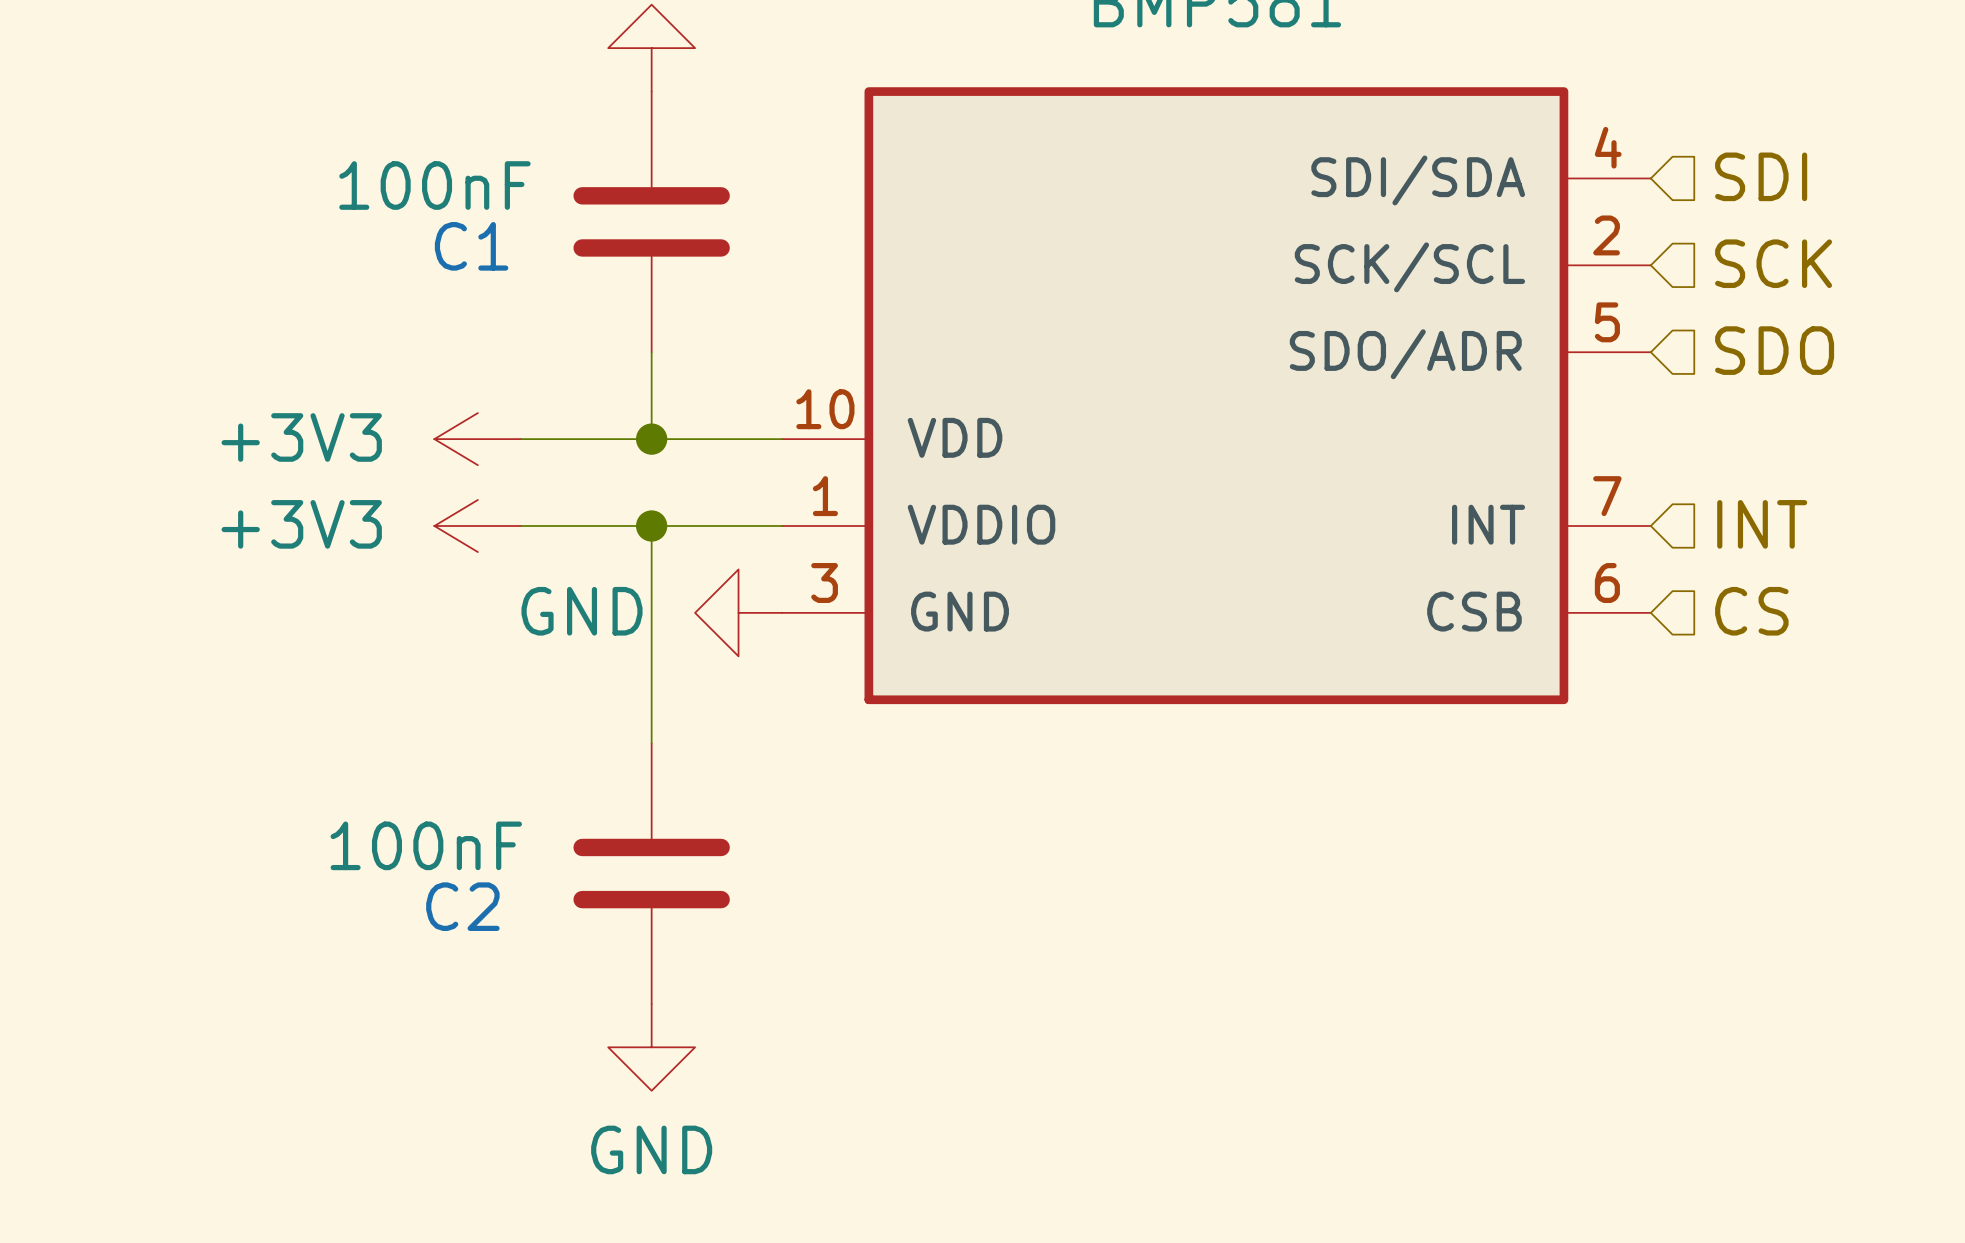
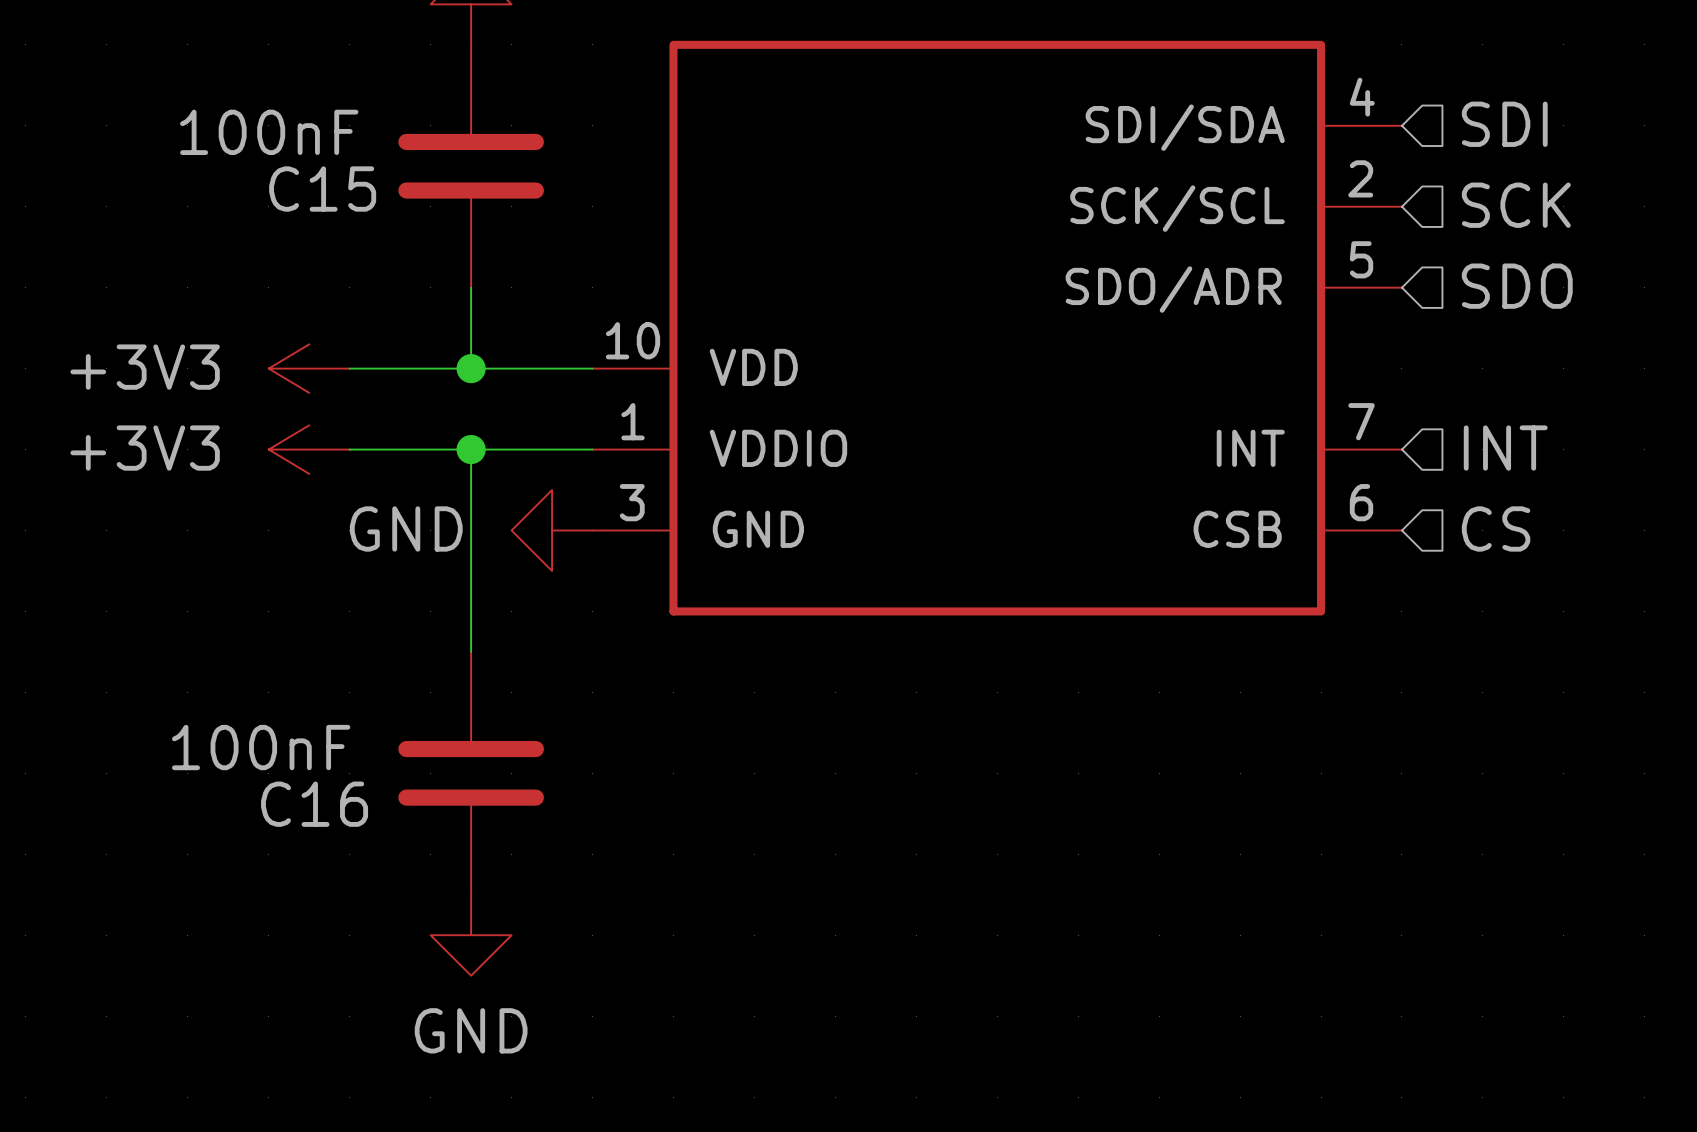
C1 name: C1 (471, 246) -> C15 (322, 189)
C2 name: C2 (462, 906) -> C16 (314, 804)

